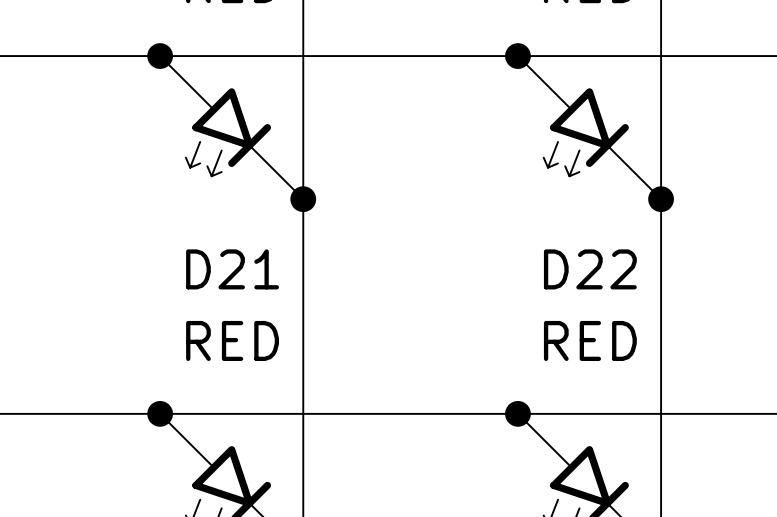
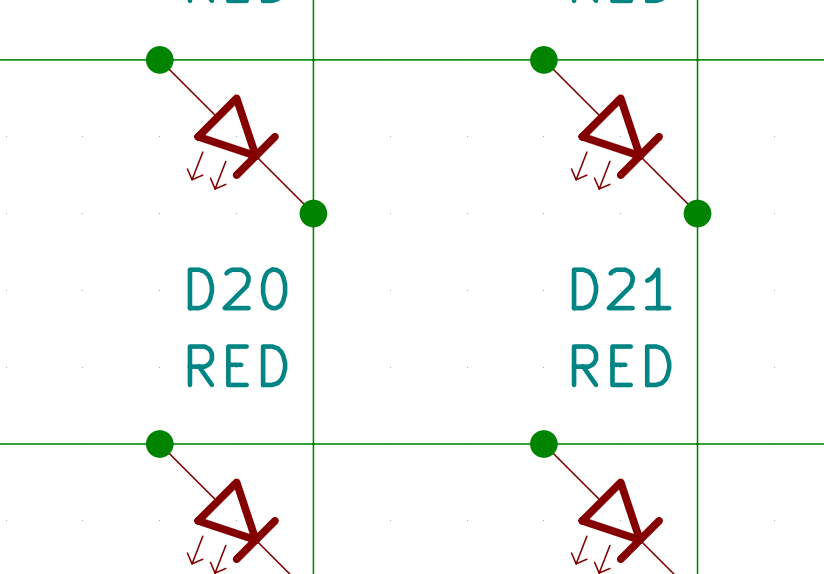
D21 name: D21 (232, 269) -> D20 (237, 288)
D22 name: D22 (590, 269) -> D21 (621, 288)

